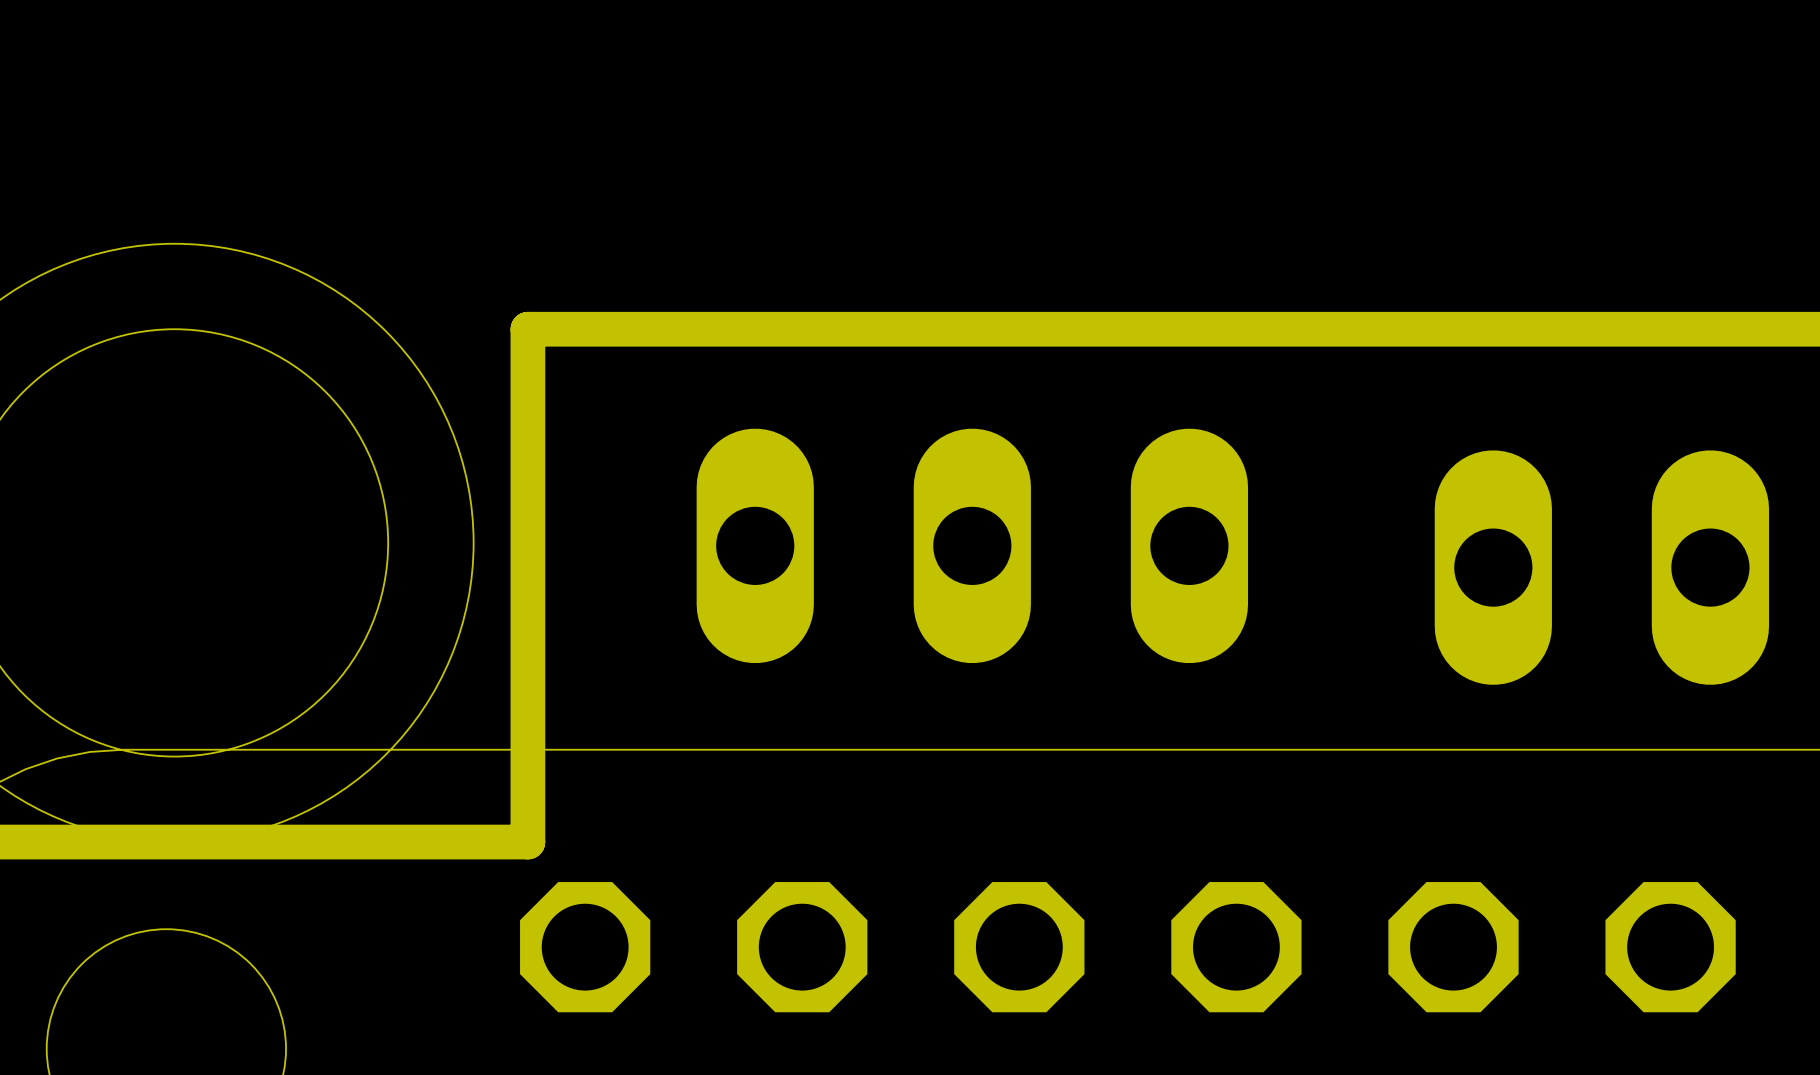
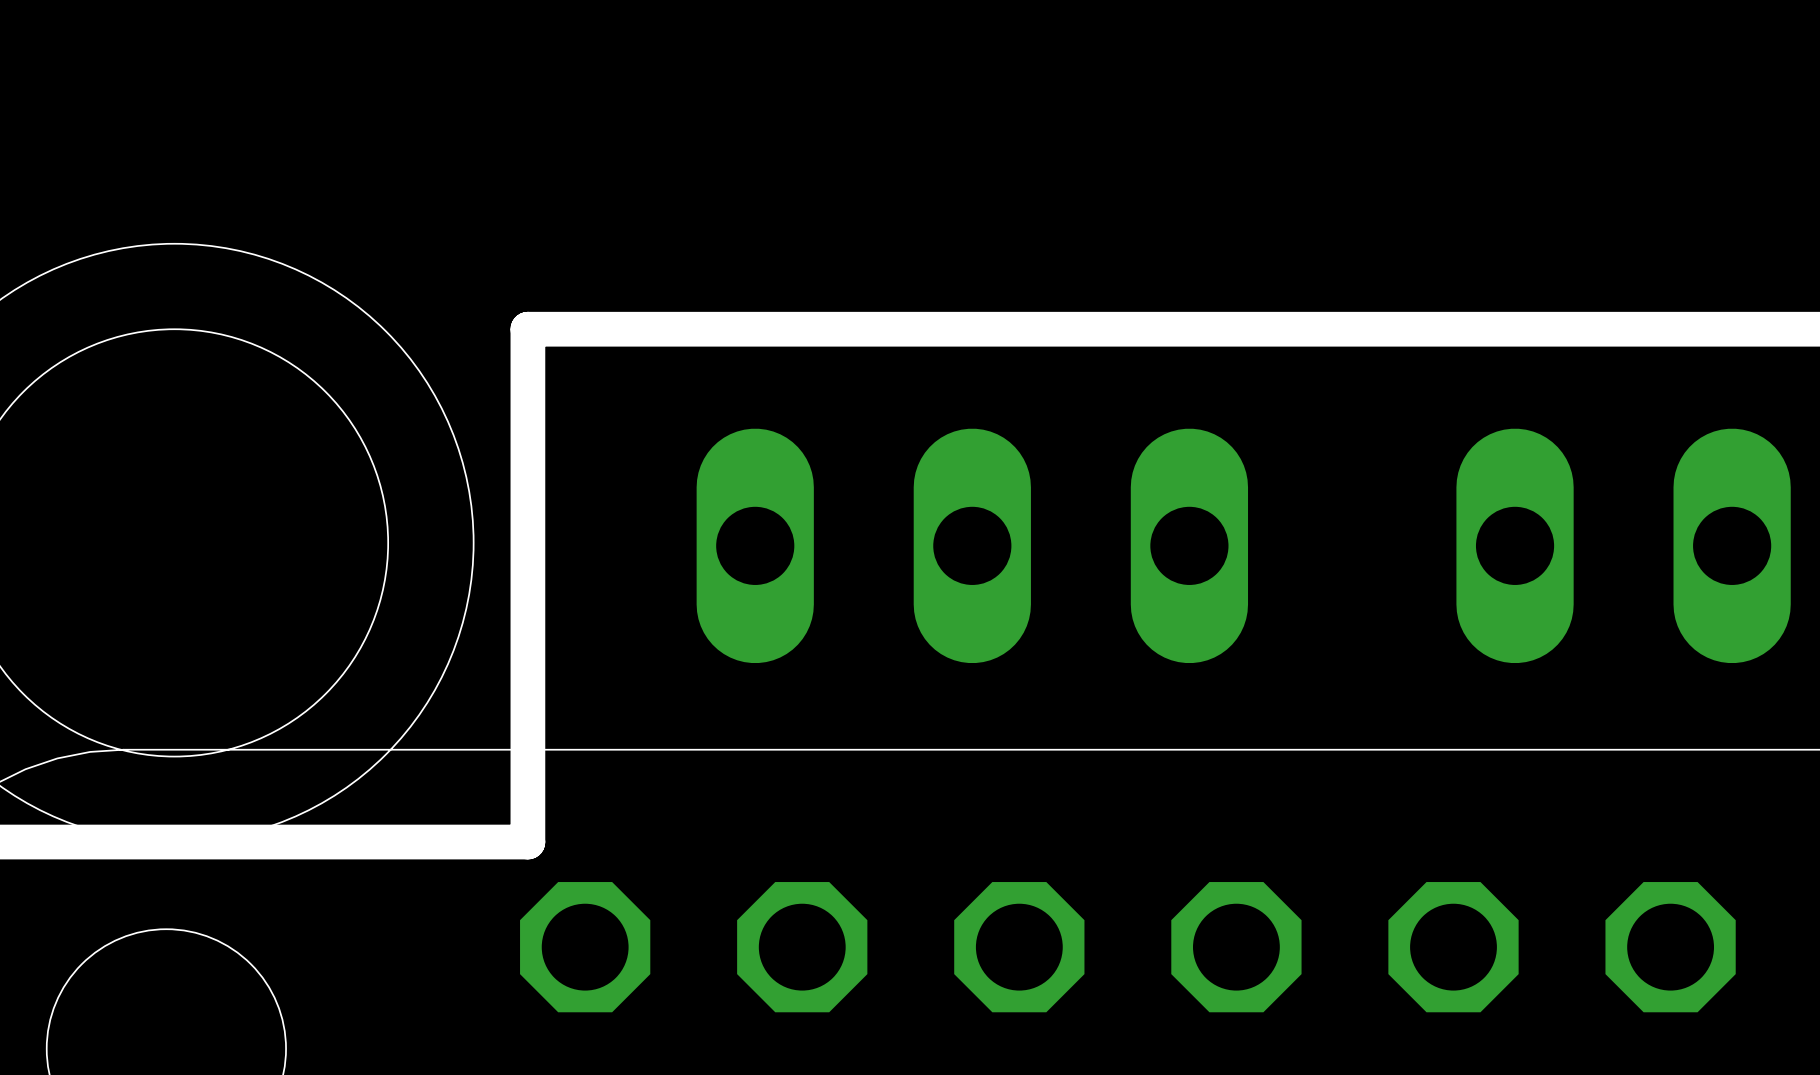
part position: (1601, 567) -> (1623, 545)

